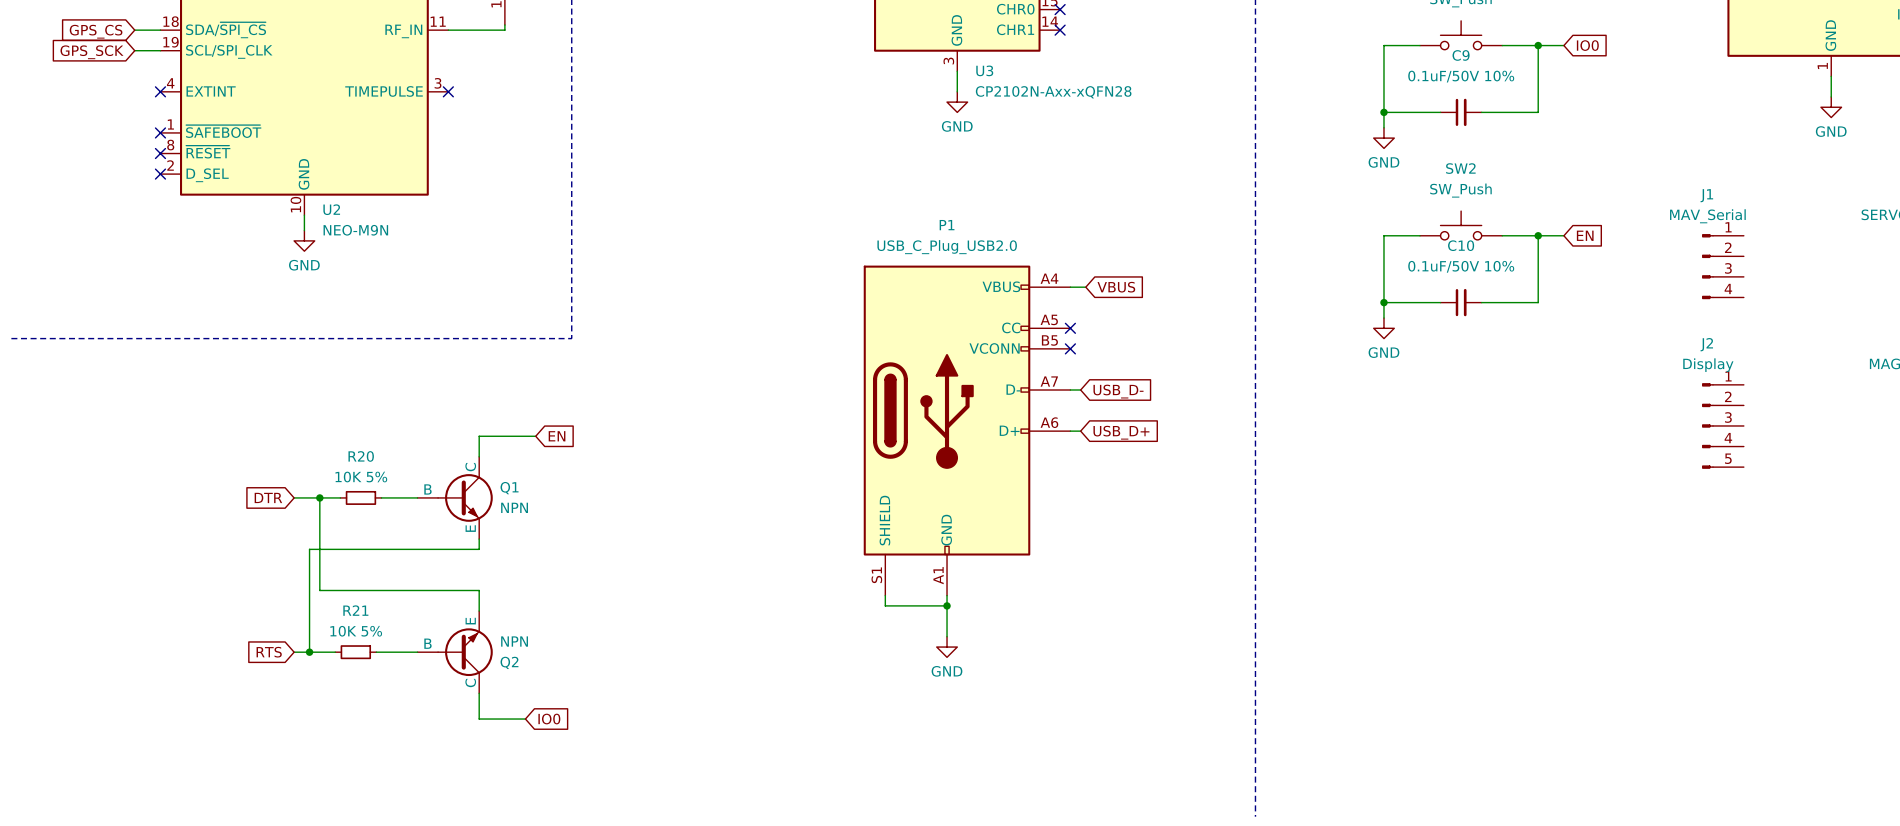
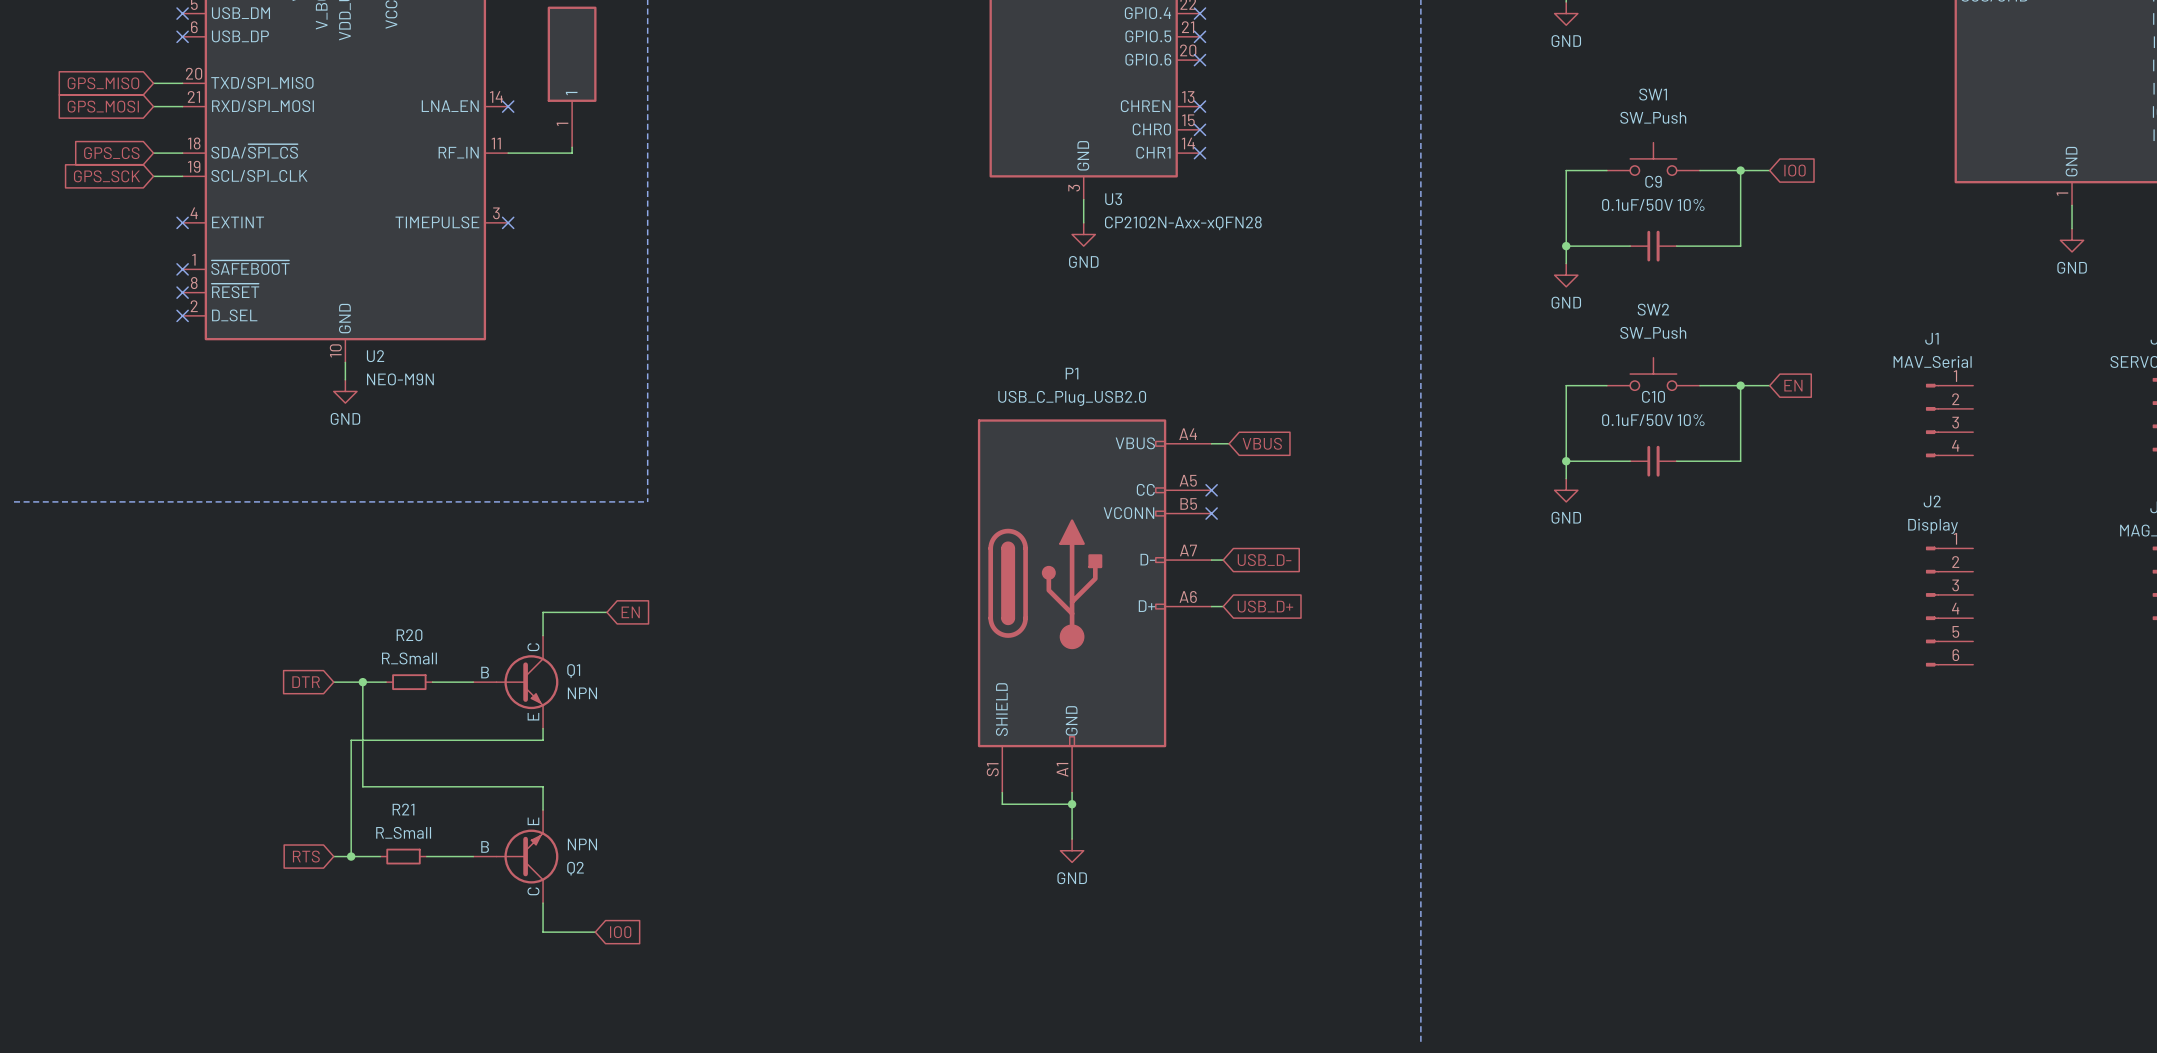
J2 symbol: [1702, 383, 1744, 469] -> [1925, 546, 1974, 667]
R20 value: 10K 5% (361, 477) -> R_Small (409, 658)
R21 value: 10K 5% (356, 631) -> R_Small (403, 832)

